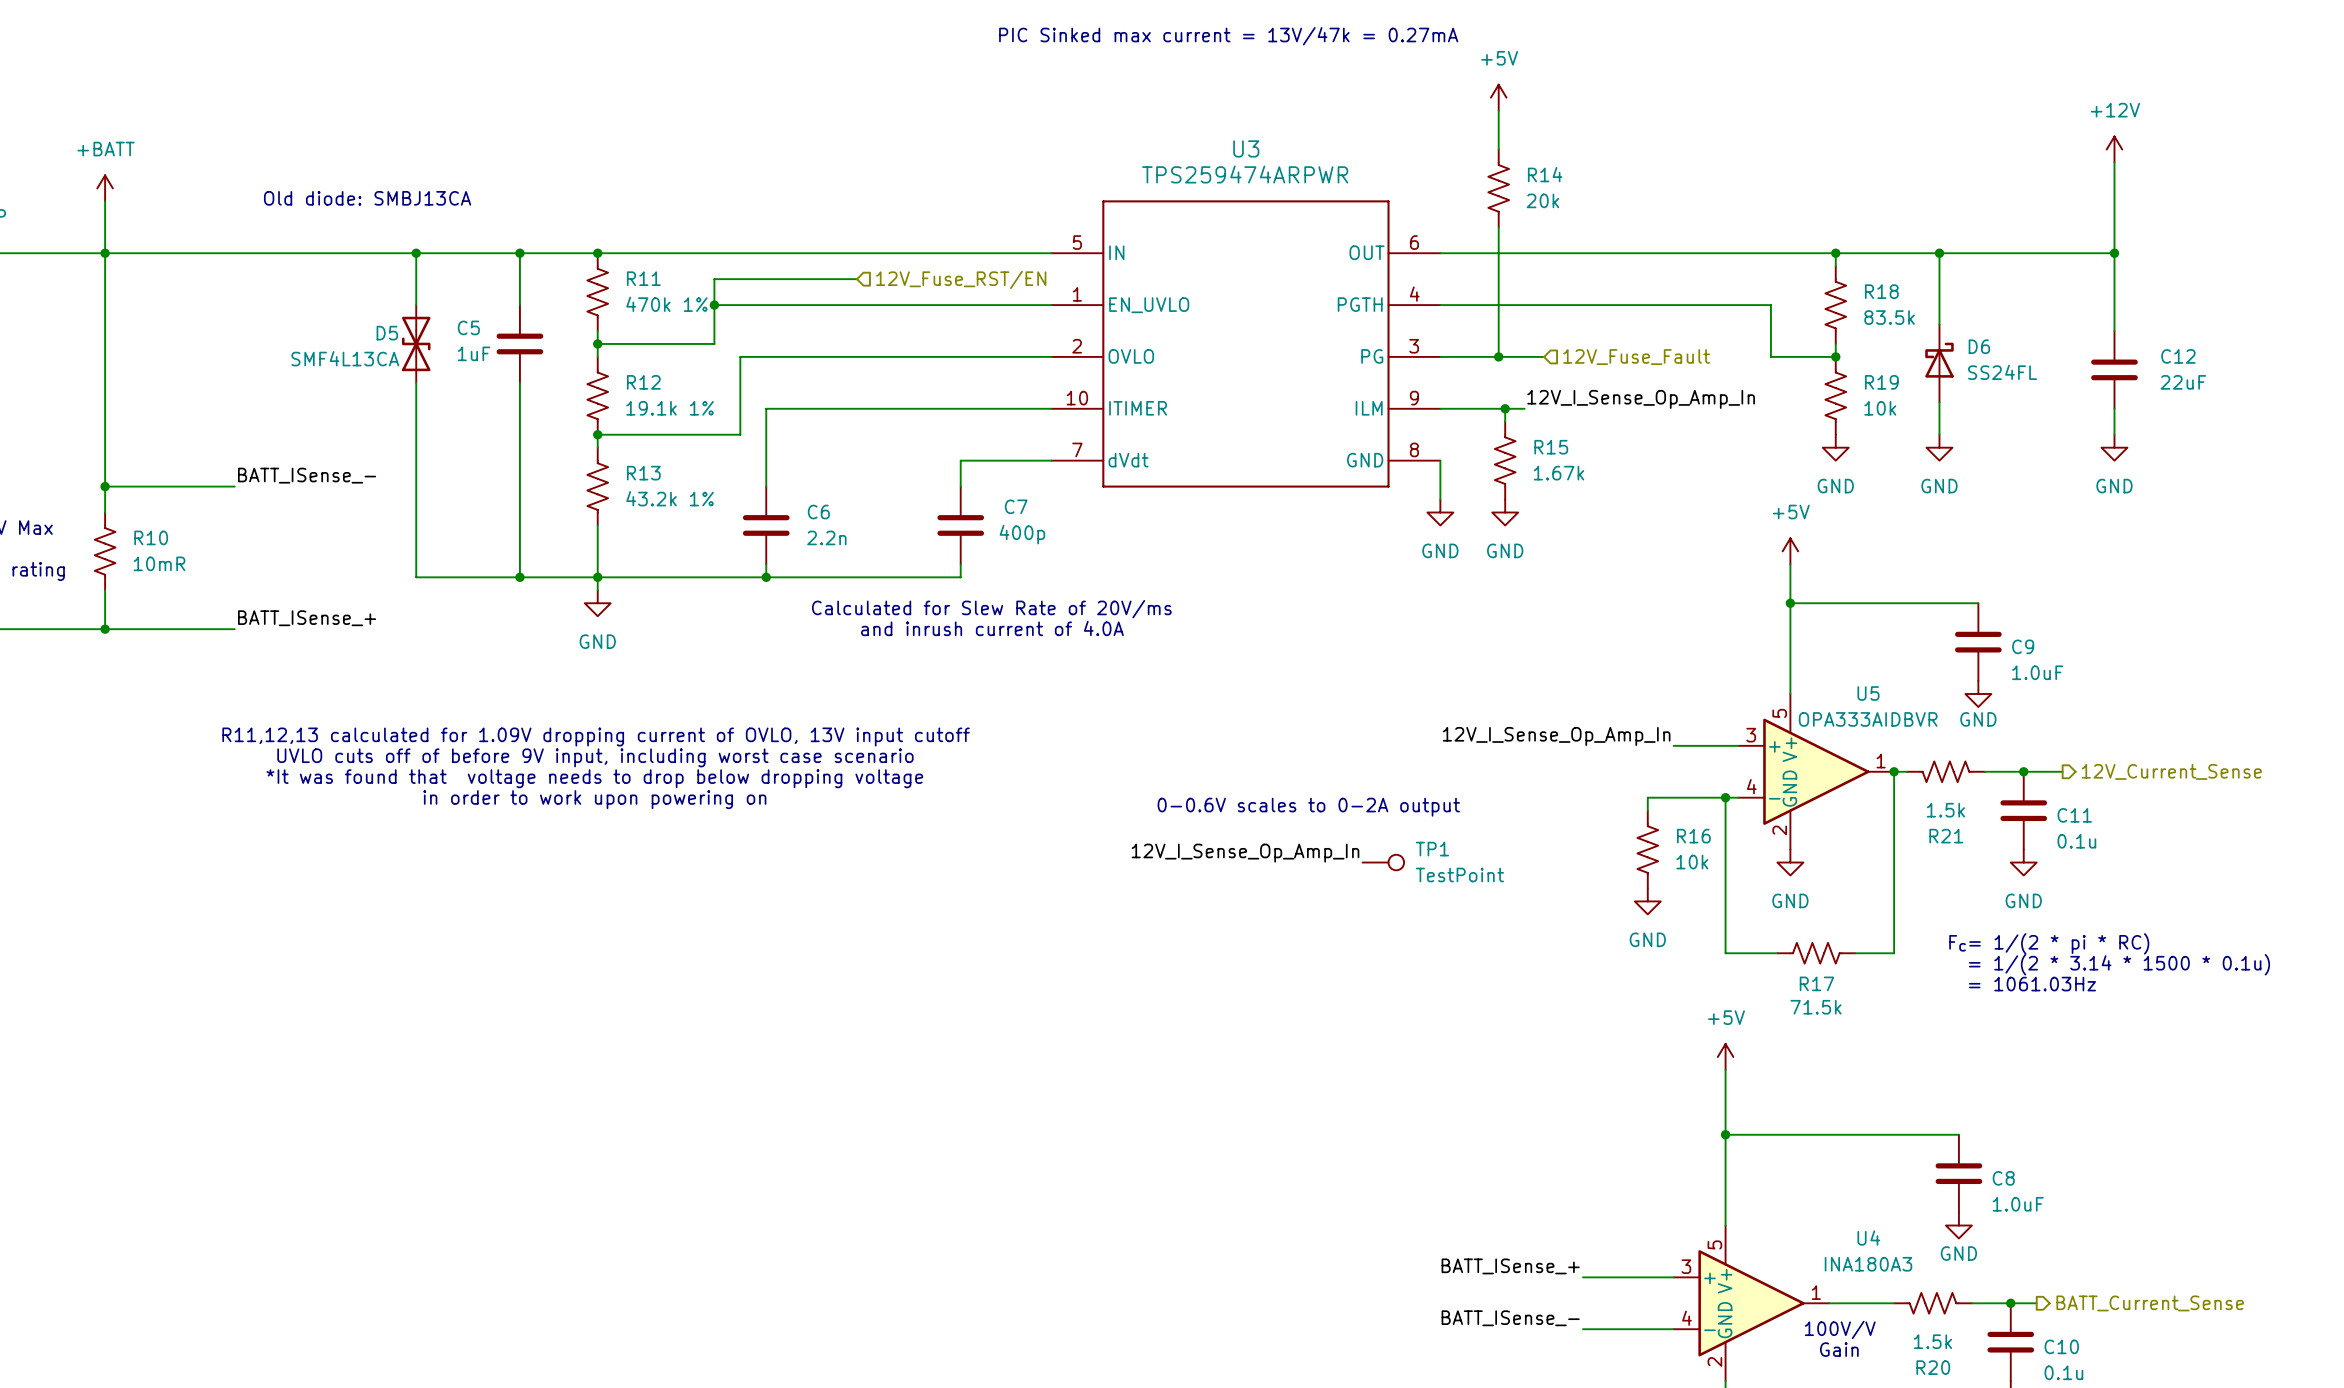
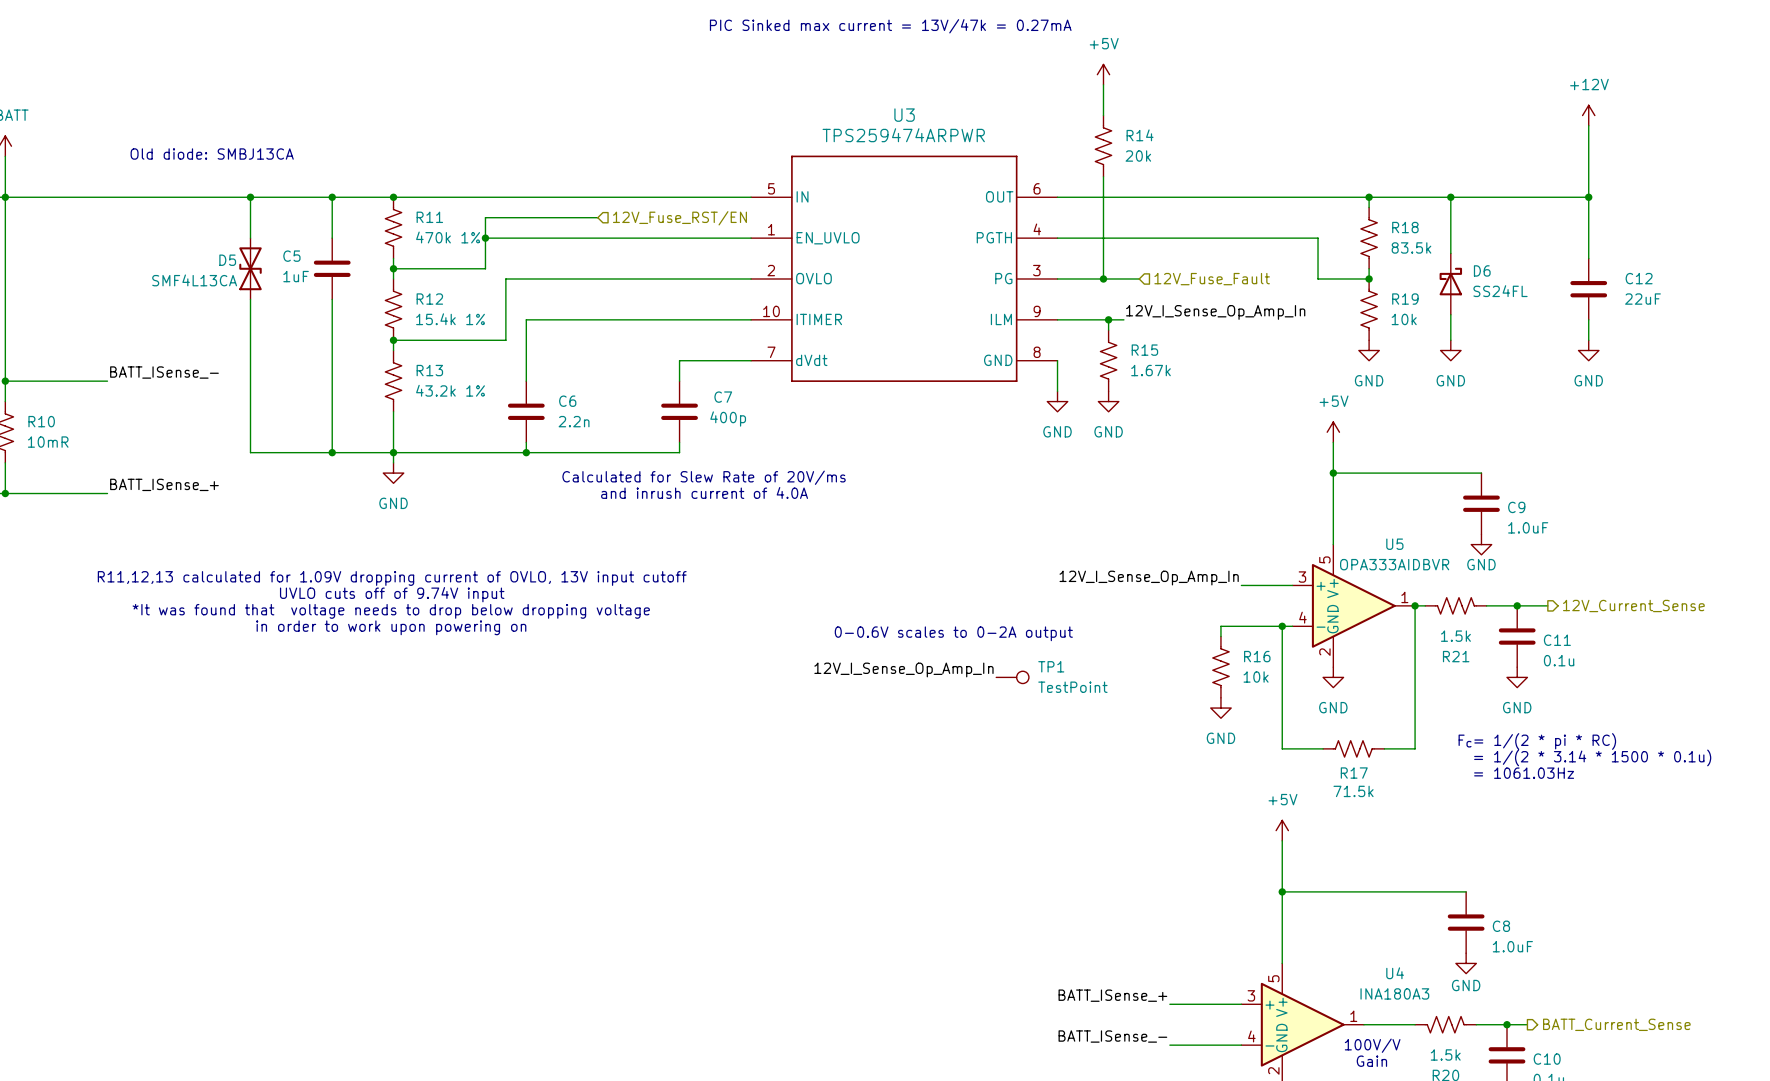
R12 value: 19.1k 1% (670, 408) -> 15.4k 1% (450, 319)
text: UVLO cuts off of before 9V input, including worst case scenario (595, 757) -> UVLO cuts off of 9.74V input (392, 594)

